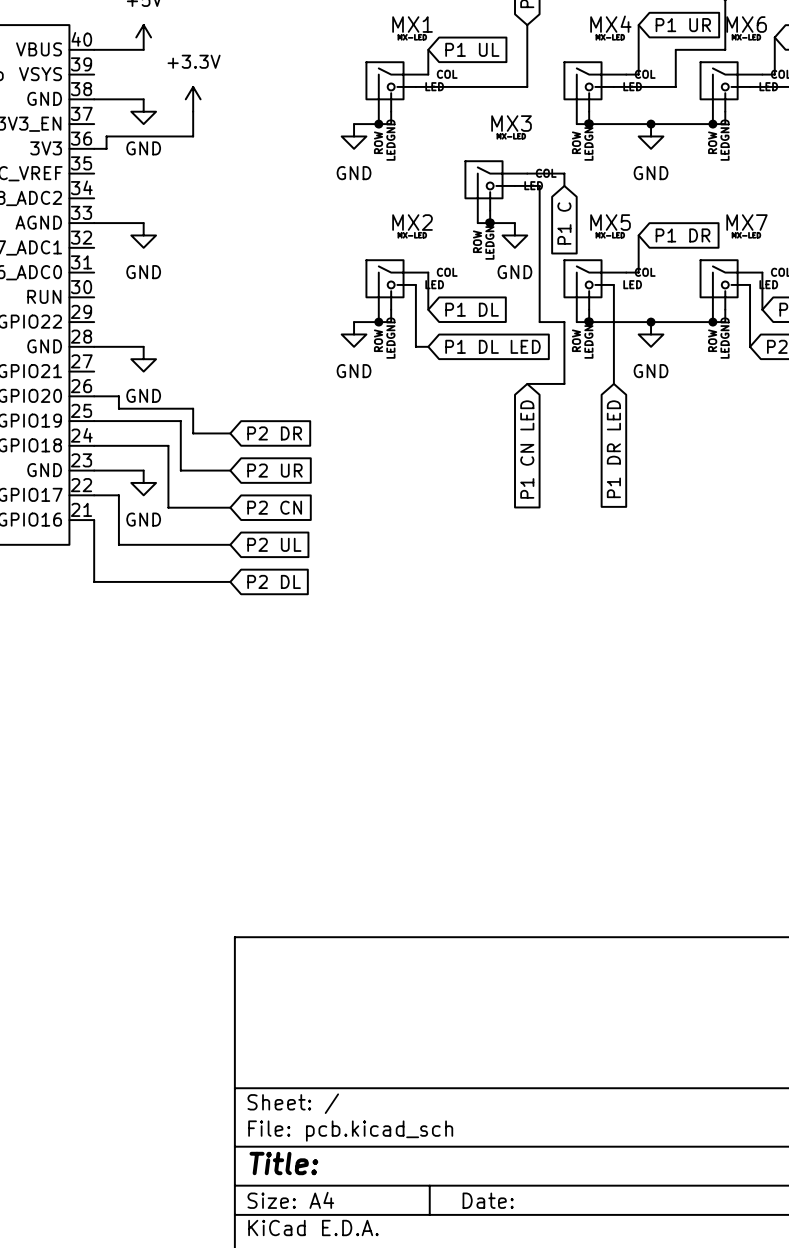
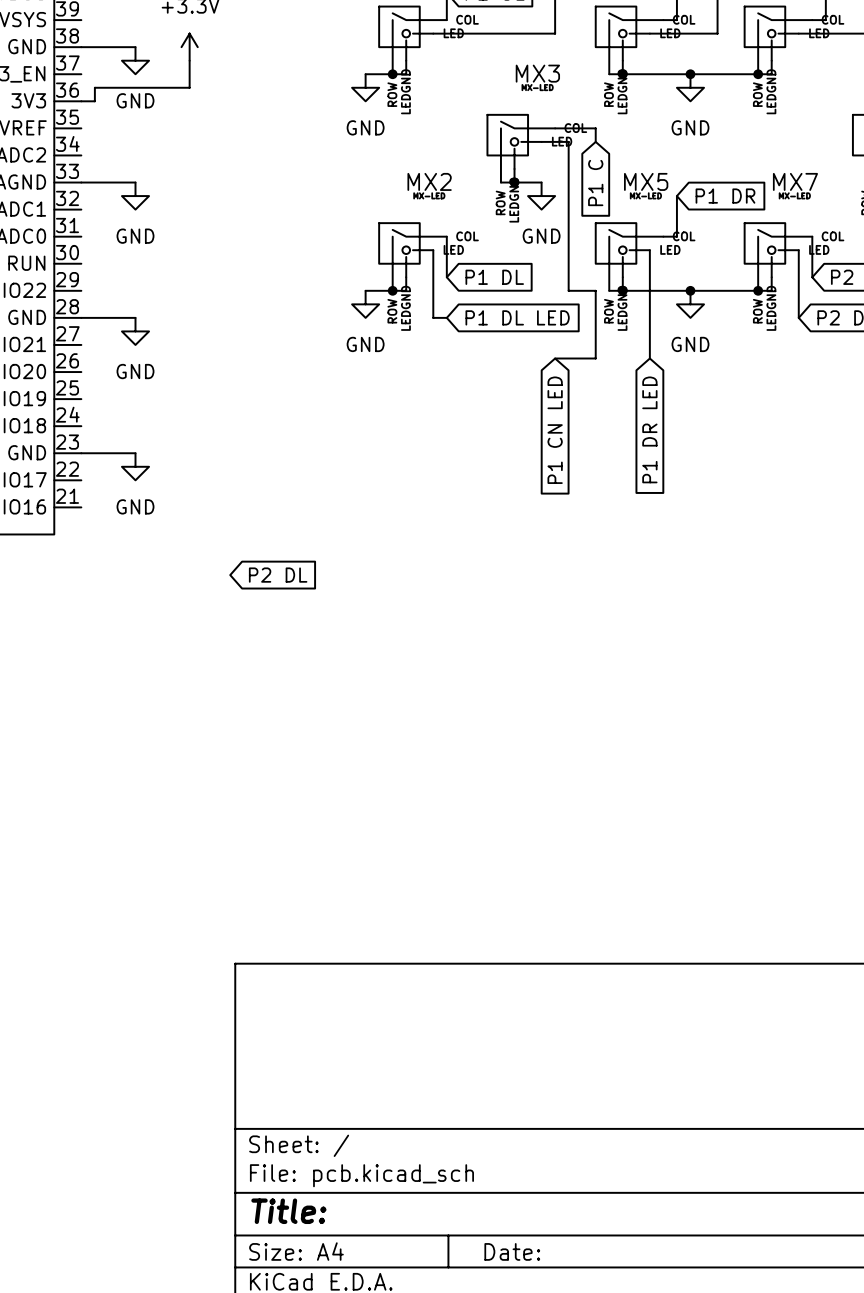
wire: (94, 396) (118, 396) (118, 408) (193, 408) (193, 433) (230, 433) -> none
wire: (94, 421) (180, 421) (180, 470) (230, 470) -> none
global label: P2 DR (274, 433) -> none
wire: (94, 445) (168, 445) (168, 507) (230, 507) -> none
global label: P2 UR (274, 470) -> none
wire: (94, 495) (118, 495) (118, 544) (230, 544) -> none
global label: P2 CN (274, 507) -> none
wire: (94, 520) (94, 581) (230, 581) -> none
global label: P2 UL (274, 544) -> none

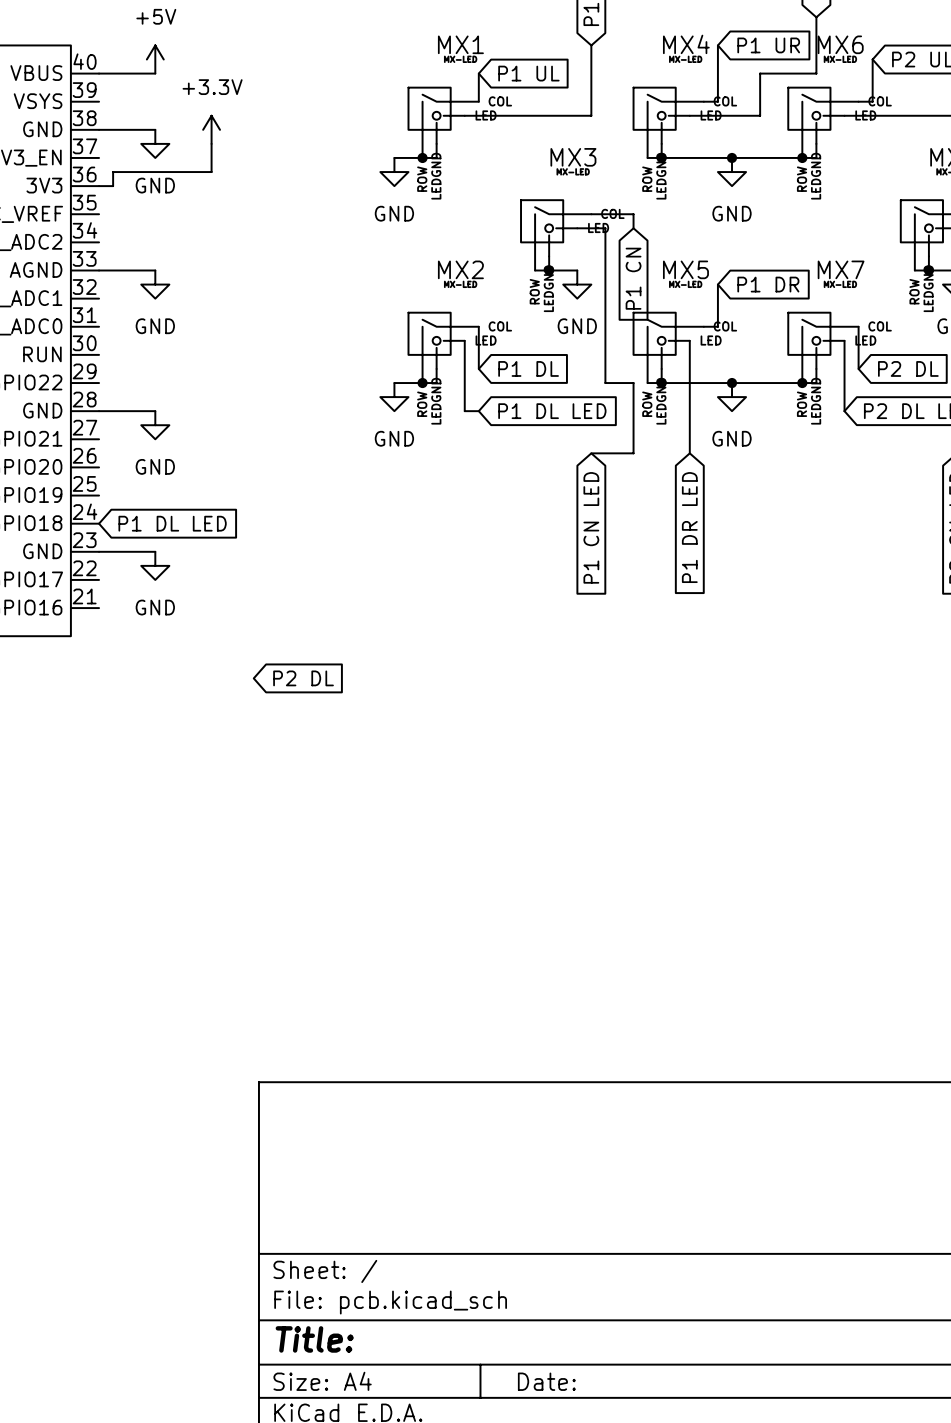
global label: P1 C (595, 183) -> P1 CN (633, 278)
global label: none -> P1 DL LED (172, 523)

